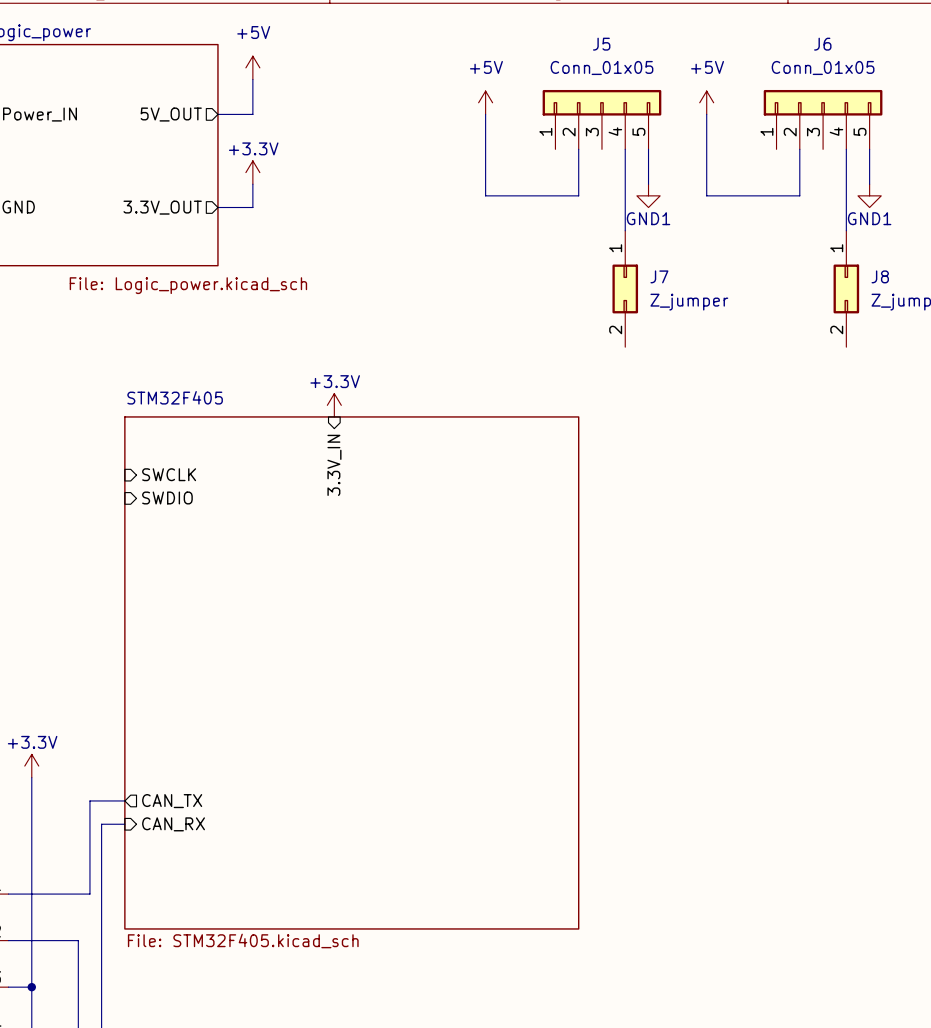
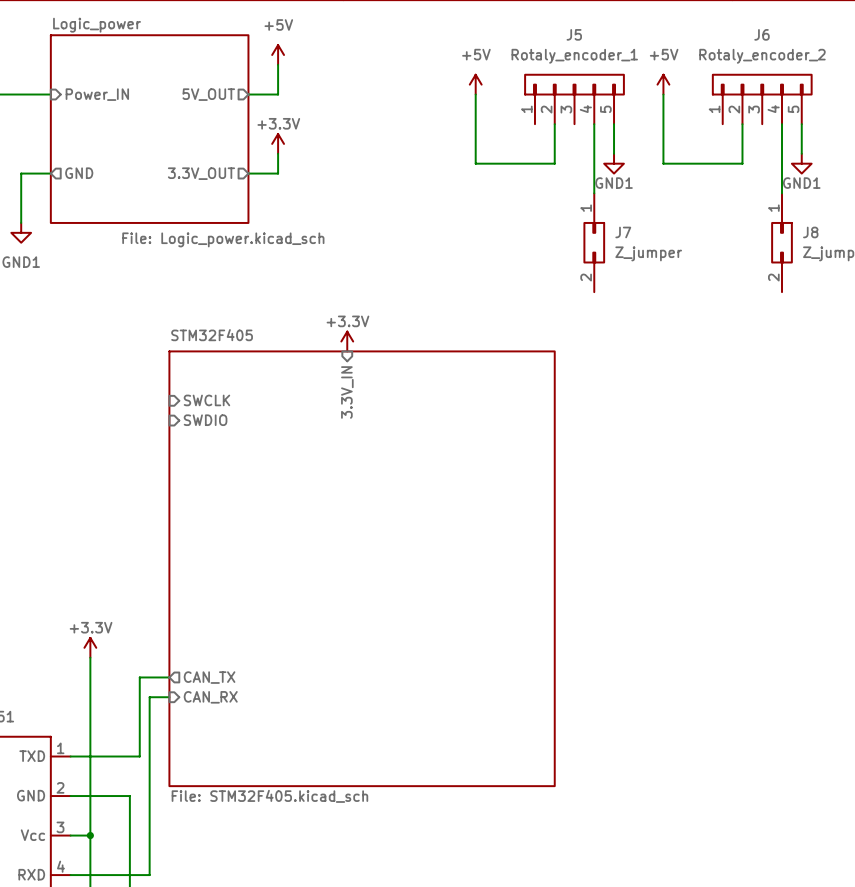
J5 value: Conn_01x05 (601, 67) -> Rotaly_encoder_1 (574, 56)
J6 value: Conn_01x05 (823, 67) -> Rotaly_encoder_2 (762, 56)

